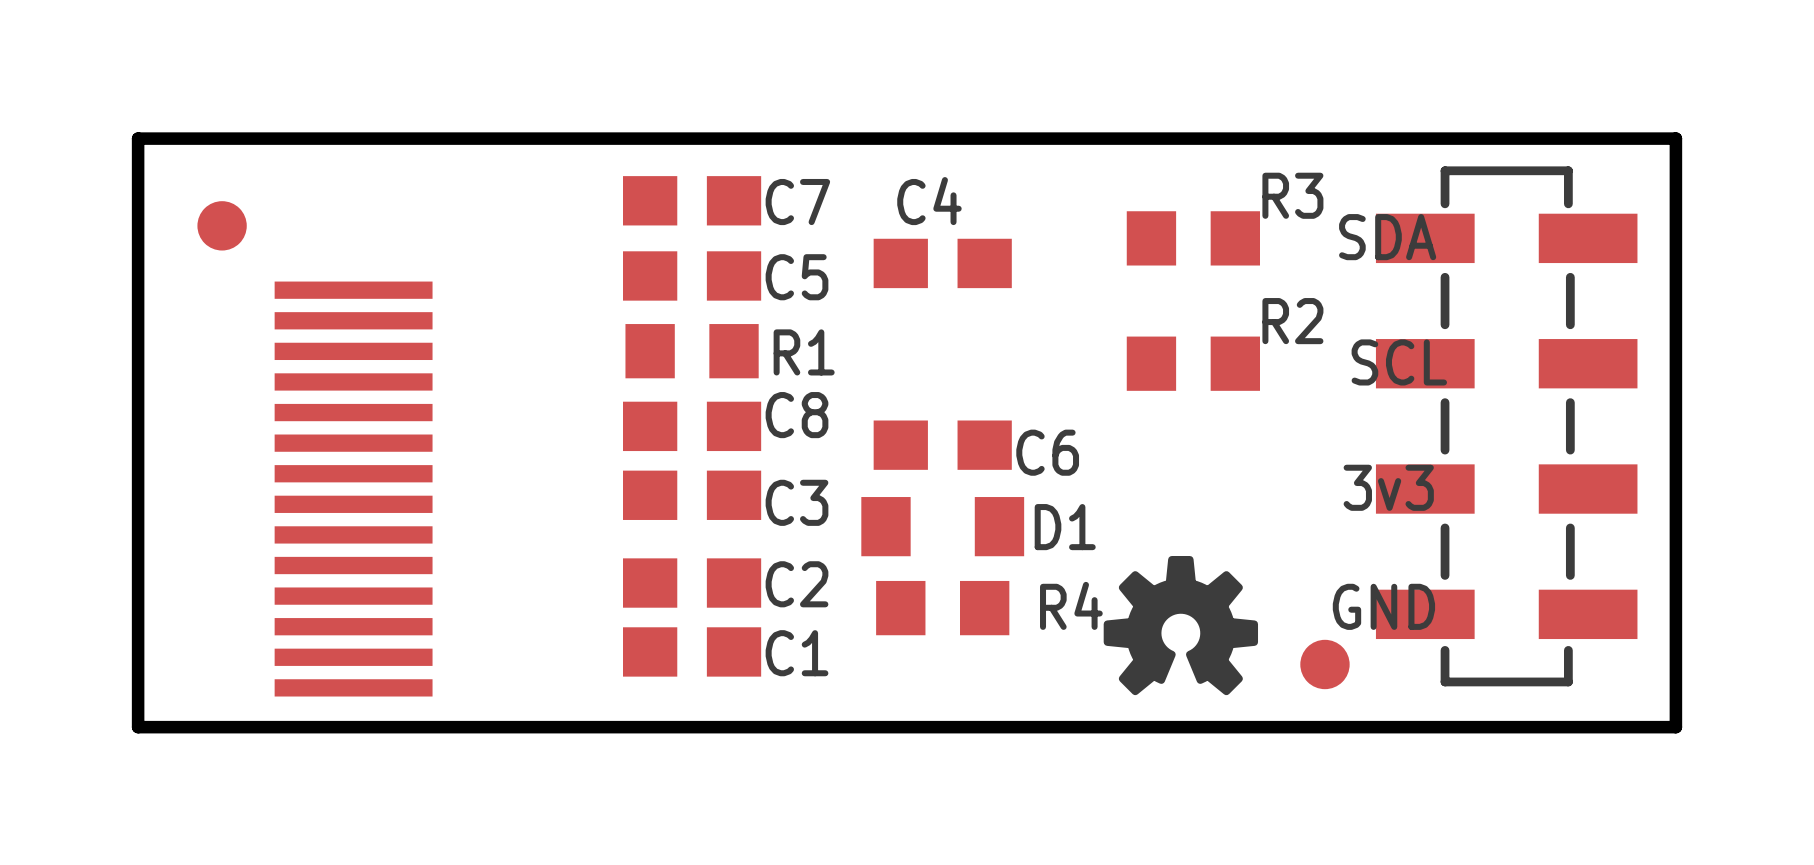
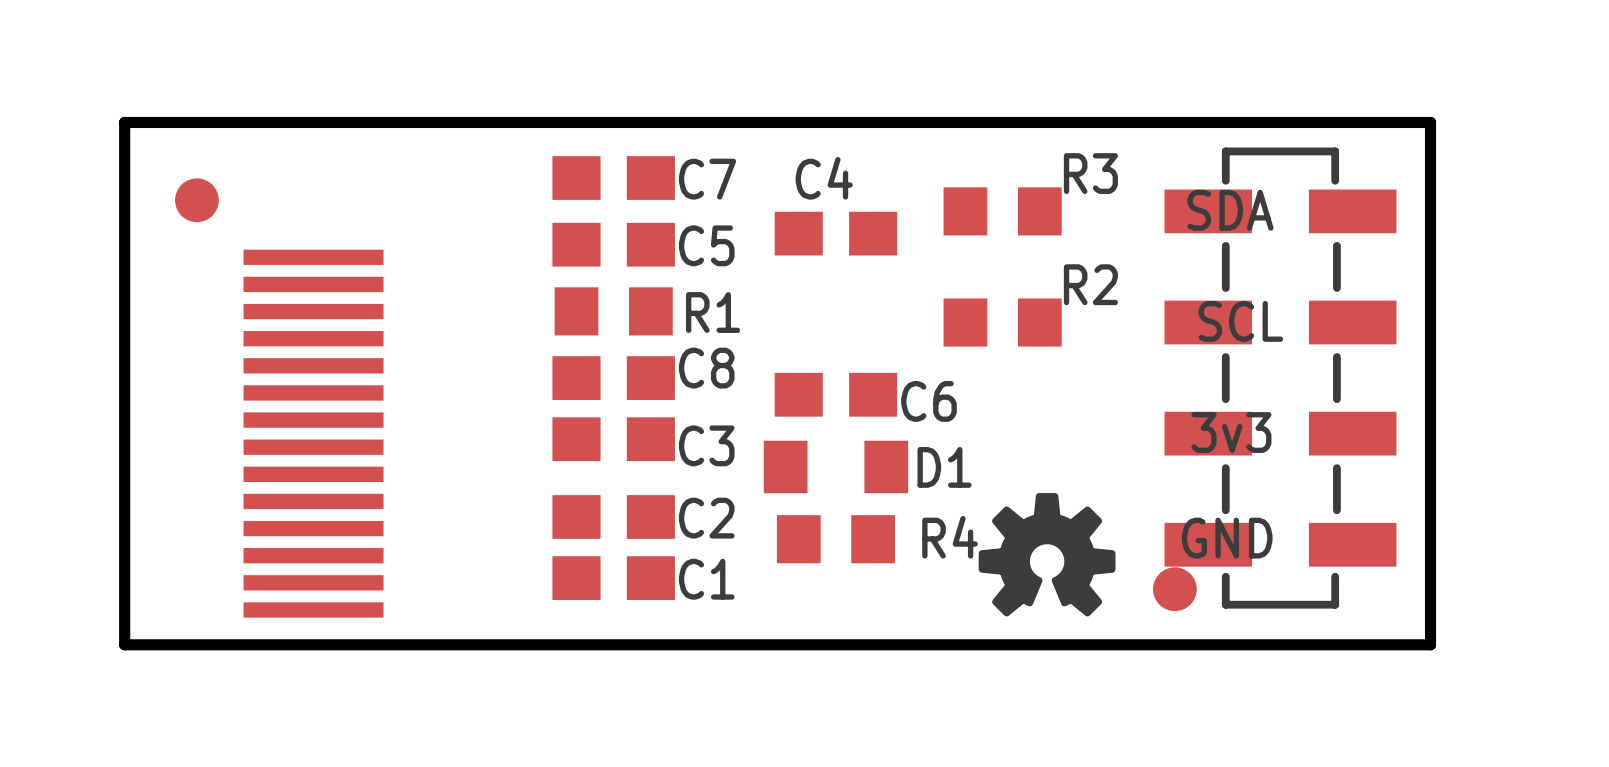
R3 position: (1193, 238) -> (1002, 211)
R2 position: (1193, 363) -> (1002, 322)
part position: (1506, 426) -> (1280, 378)
board edge: (140, 727) (138, 727) (138, 138) (1675, 138) (1675, 727) (1613, 727) -> (124, 644) (124, 122) (1430, 122) (1430, 644)

